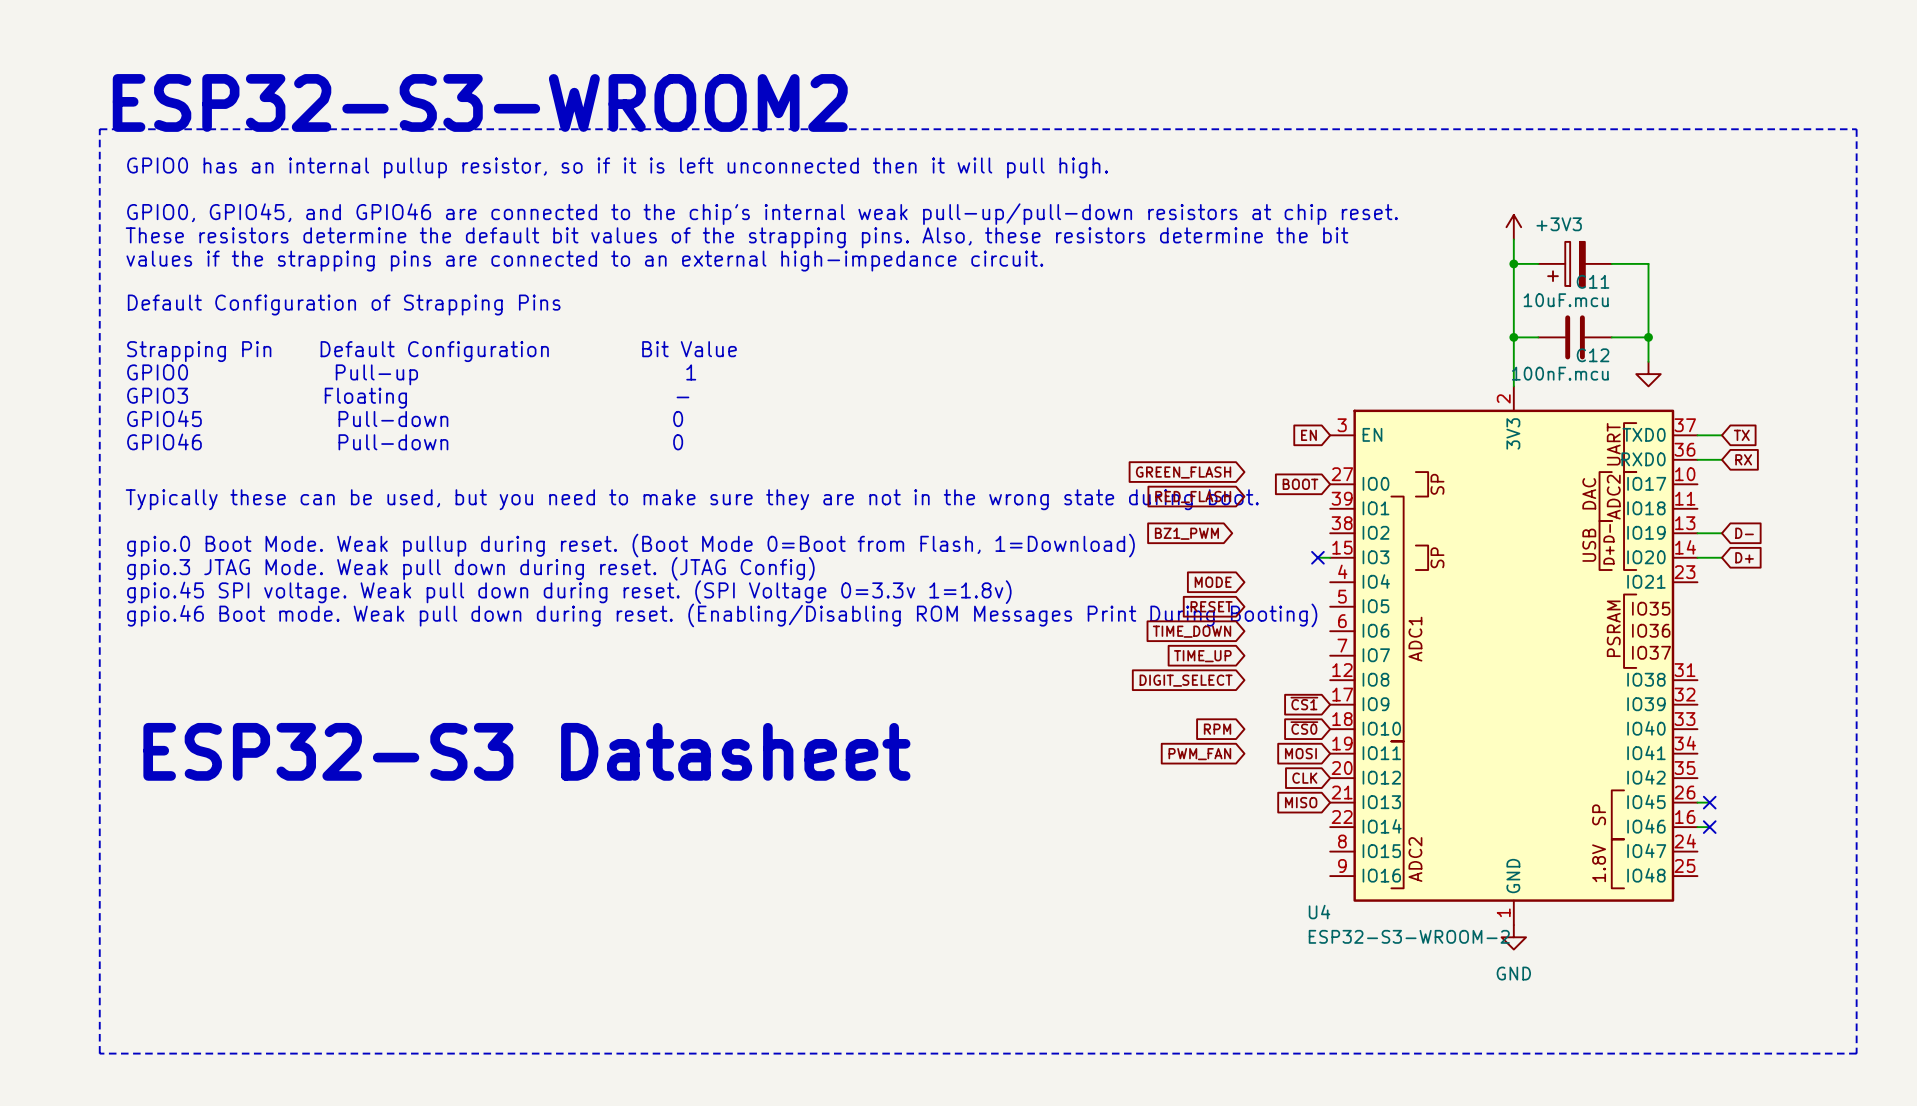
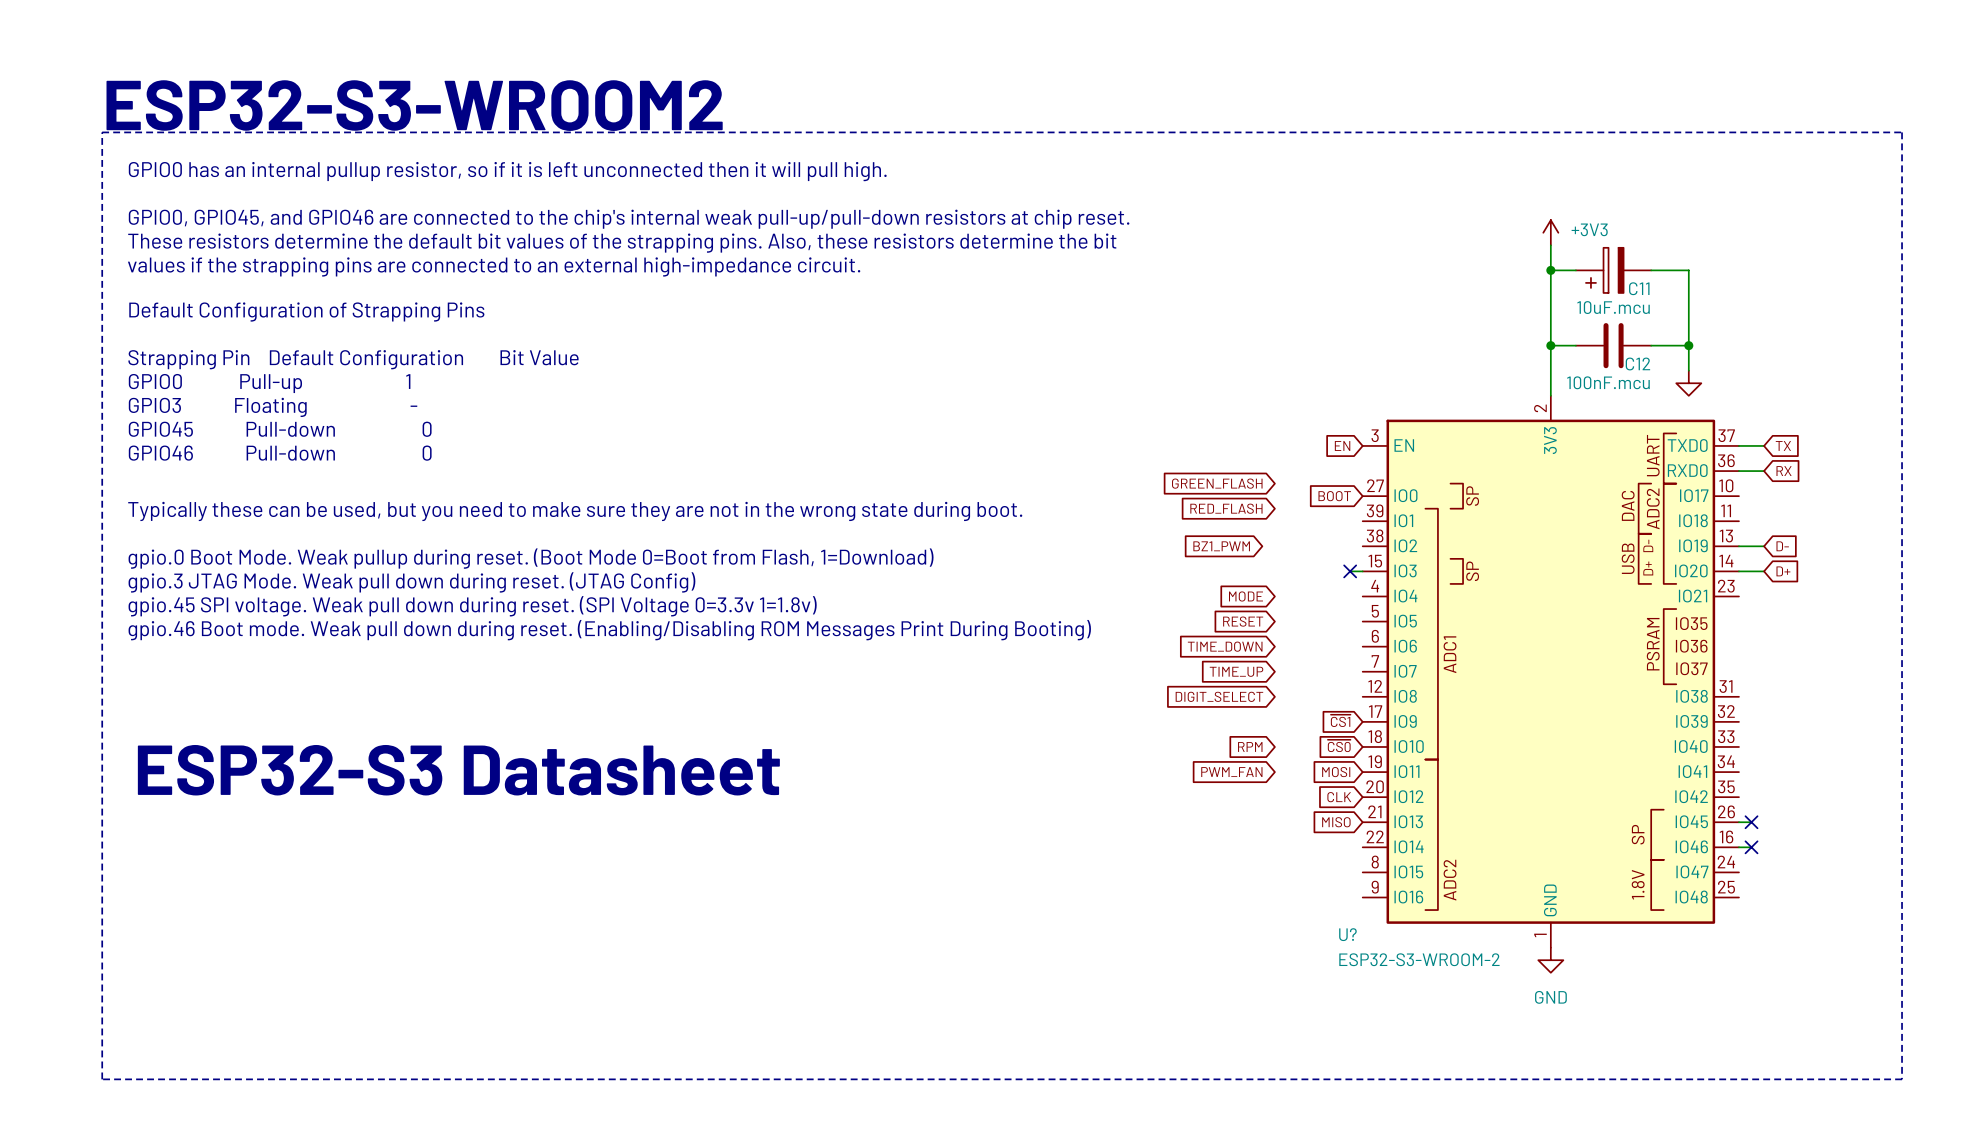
U4 name: U4 (1319, 912) -> U? (1347, 934)

